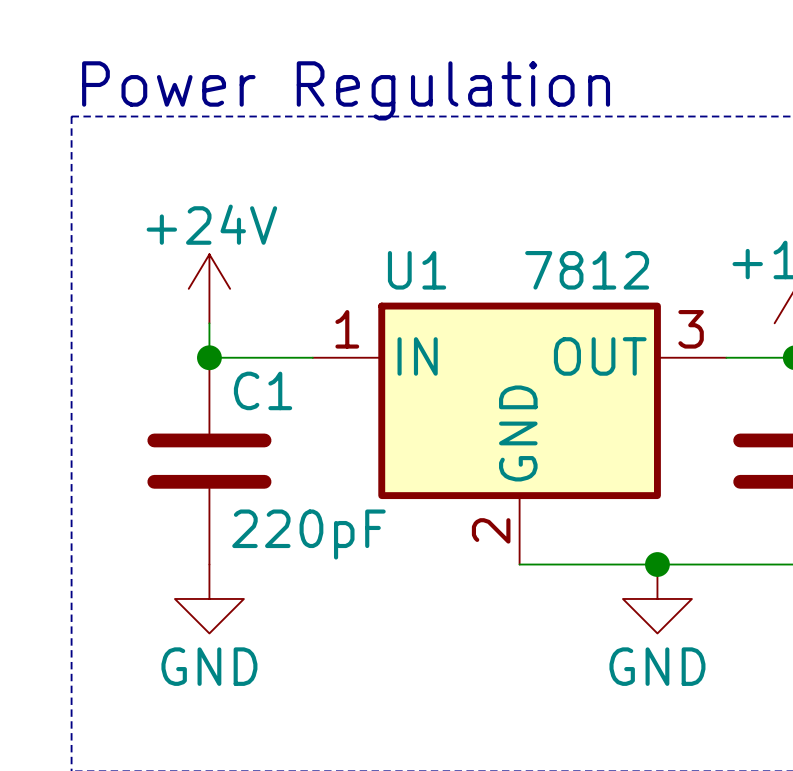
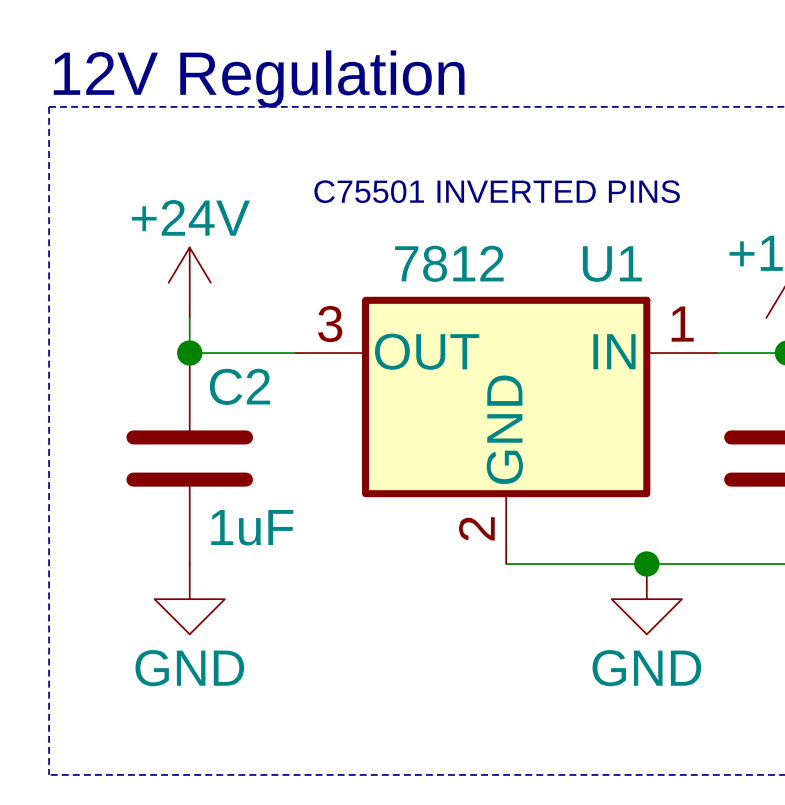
text: Power Regulation (346, 90) -> 12V Regulation (259, 78)
text: none -> C75501 INVERTED PINS (497, 191)
C1 name: C1 (263, 390) -> C2 (239, 386)
U1 flip: as is (519, 400) -> left-right (506, 396)
C1 value: 220pF (308, 534) -> 1uF (252, 527)

